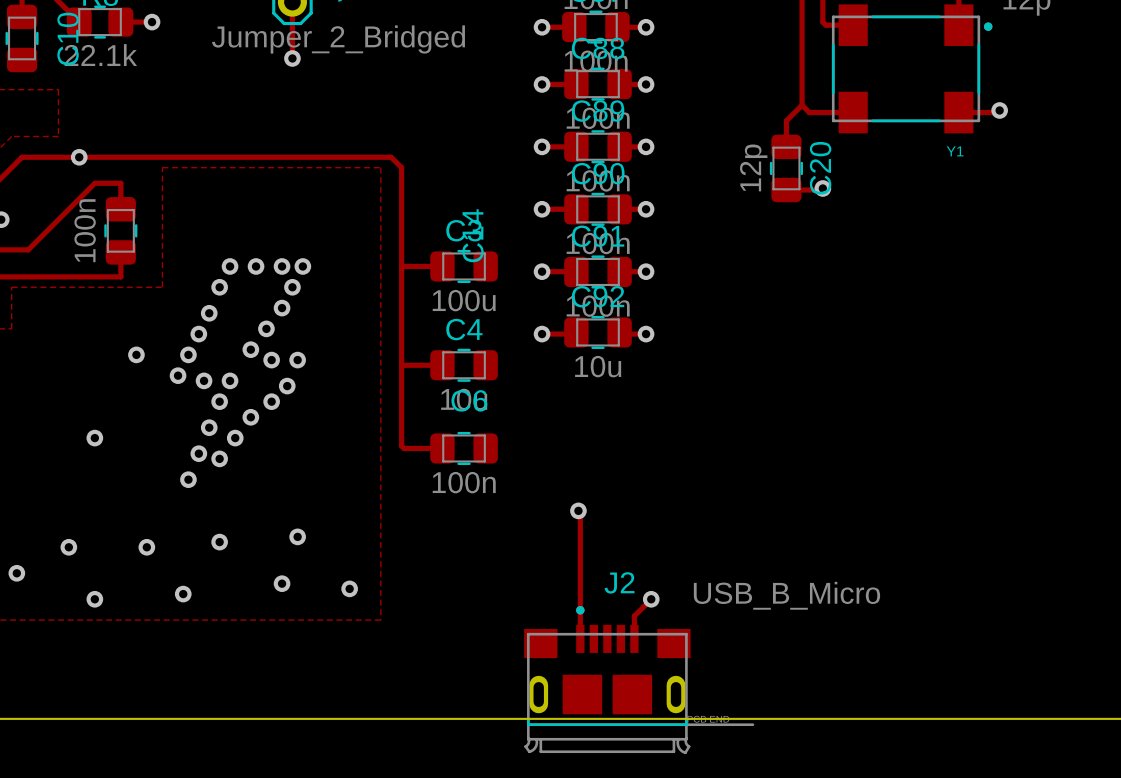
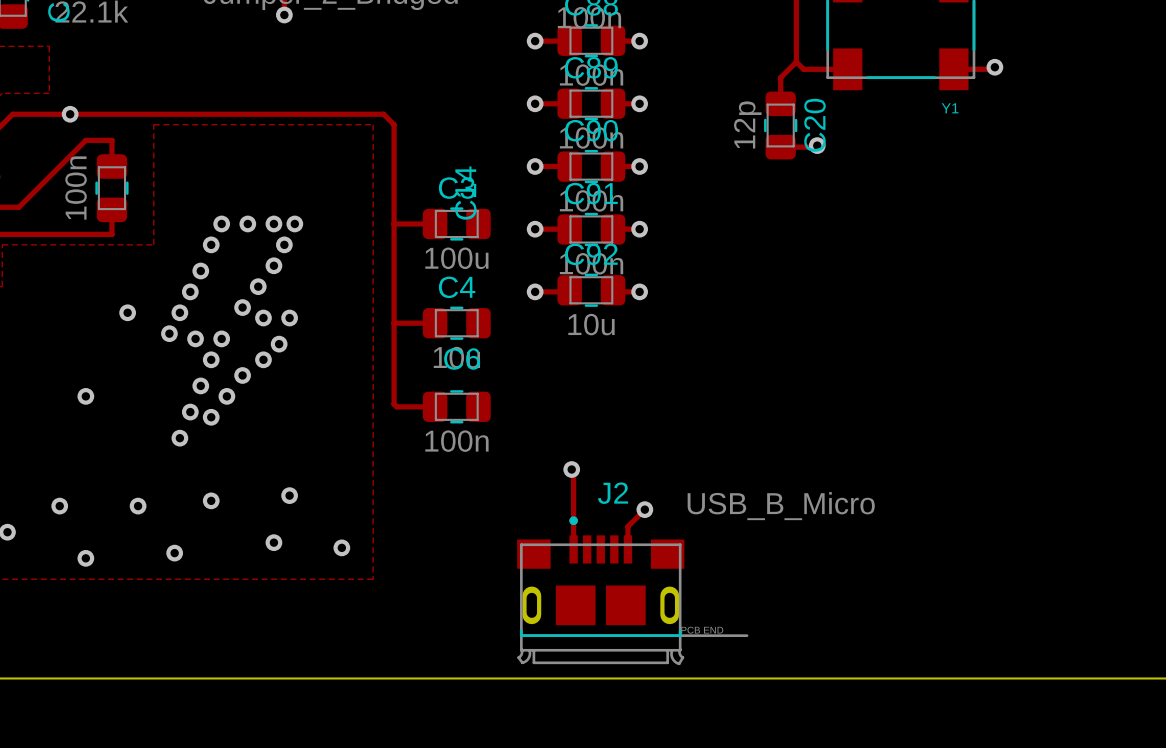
track: (580, 590) (580, 638) -> none
track: (651, 599) (634, 616) (634, 638) -> (644, 509) (627, 526) (627, 549)
via position: (651, 599) -> (644, 509)
J2 position: (639, 680) -> (632, 590)

